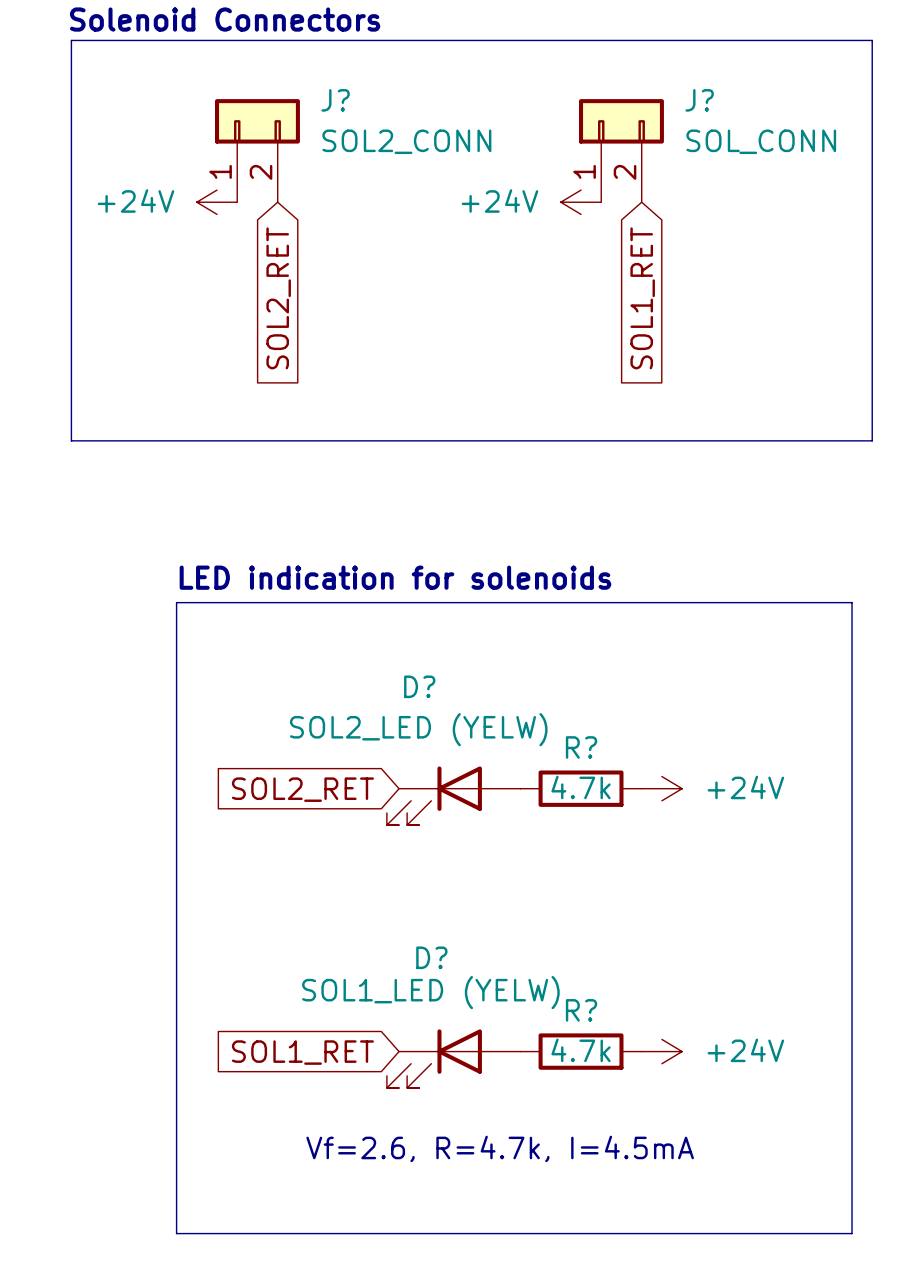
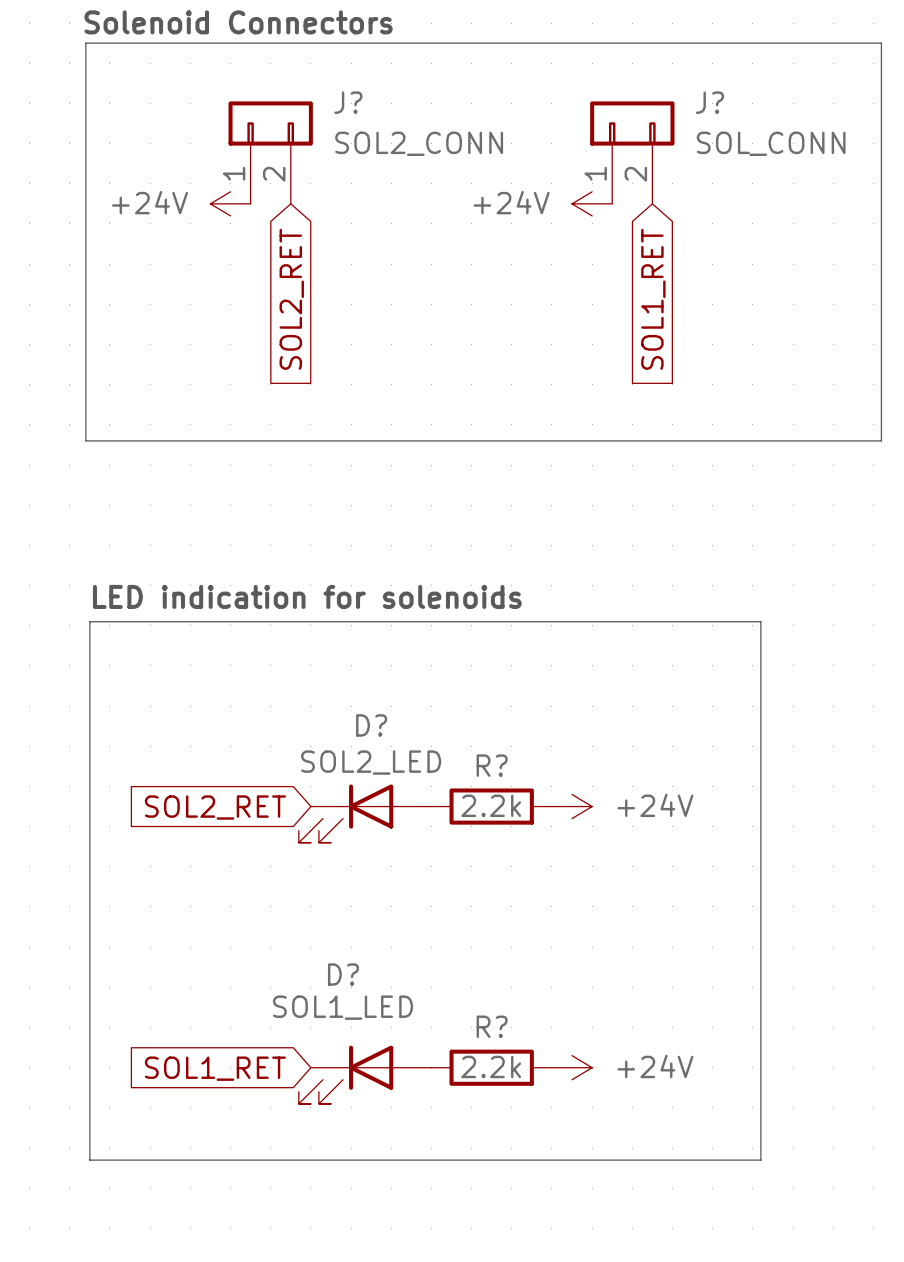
text position: LED indication for solenoids (395, 577) -> LED indication for solenoids (307, 596)
line: (176, 602) (852, 602) (852, 1233) (176, 1233) (176, 602) -> (89, 621) (89, 1160) (760, 1160) (760, 621) (89, 621)
R?: 4.7k (581, 788) -> none
power symbol position: +24V (661, 788) -> +24V (572, 806)
global label position: SOL2_RET (302, 789) -> SOL2_RET (215, 807)
D?: SOL2_LED (YELW) (453, 795) -> none
R?: none -> 2.2k (491, 806)
D?: none -> SOL2_LED (365, 813)
R?: 4.7k (581, 1051) -> none
power symbol position: +24V (661, 1051) -> +24V (572, 1067)
global label position: SOL1_RET (302, 1052) -> SOL1_RET (215, 1068)
D?: SOL1_LED (YELW) (453, 1058) -> none
R?: none -> 2.2k (491, 1067)
D?: none -> SOL1_LED (365, 1074)
text: Vf=2.6, R=4.7k, I=4.5mA (500, 1148) -> none

